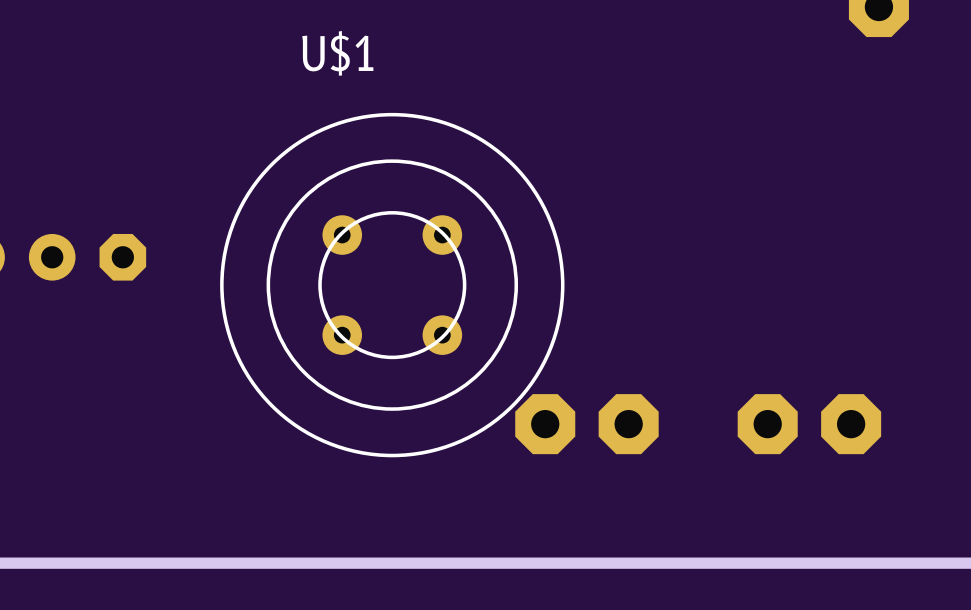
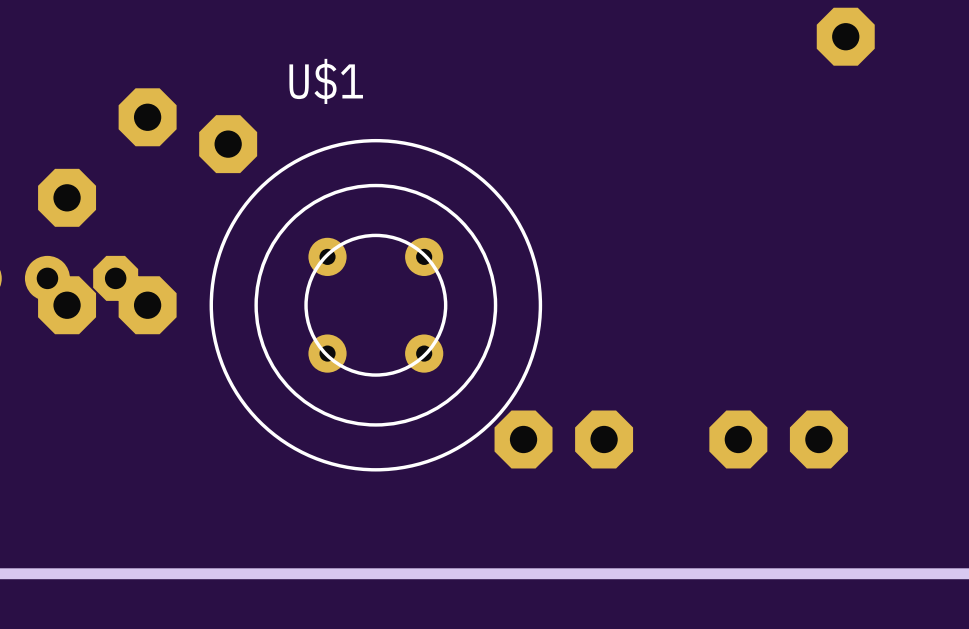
part: none -> (147, 117)
part: none -> (228, 144)
part: none -> (67, 197)
part: none -> (67, 305)
part: none -> (147, 305)

